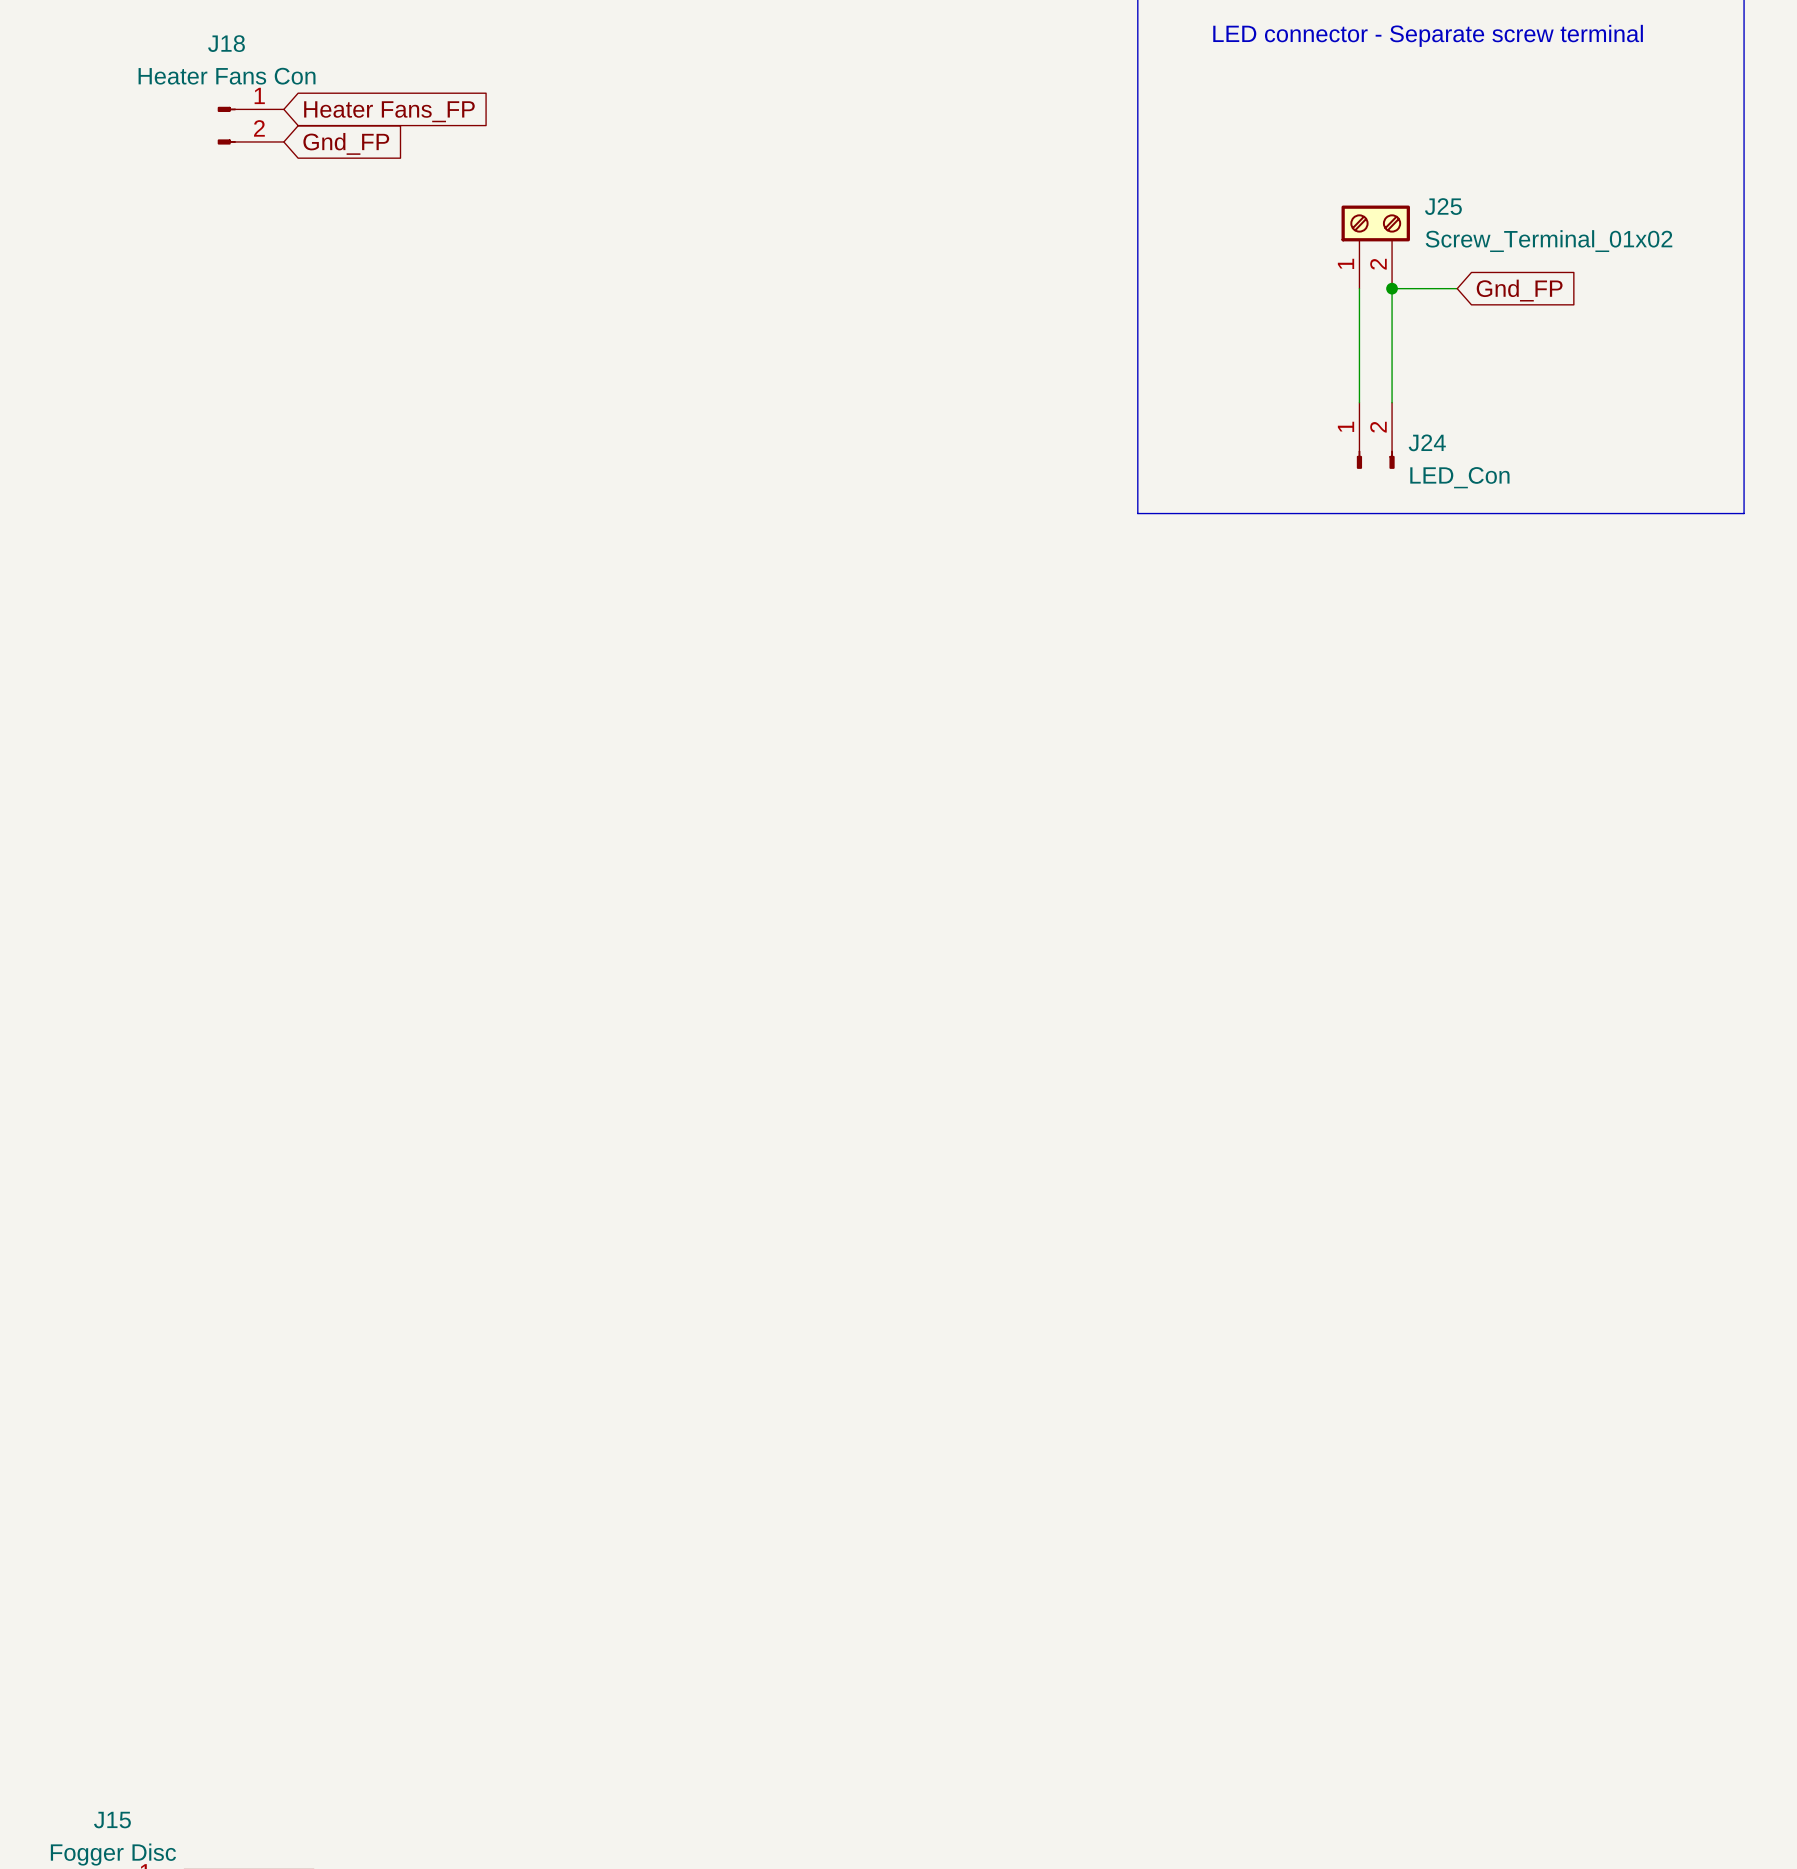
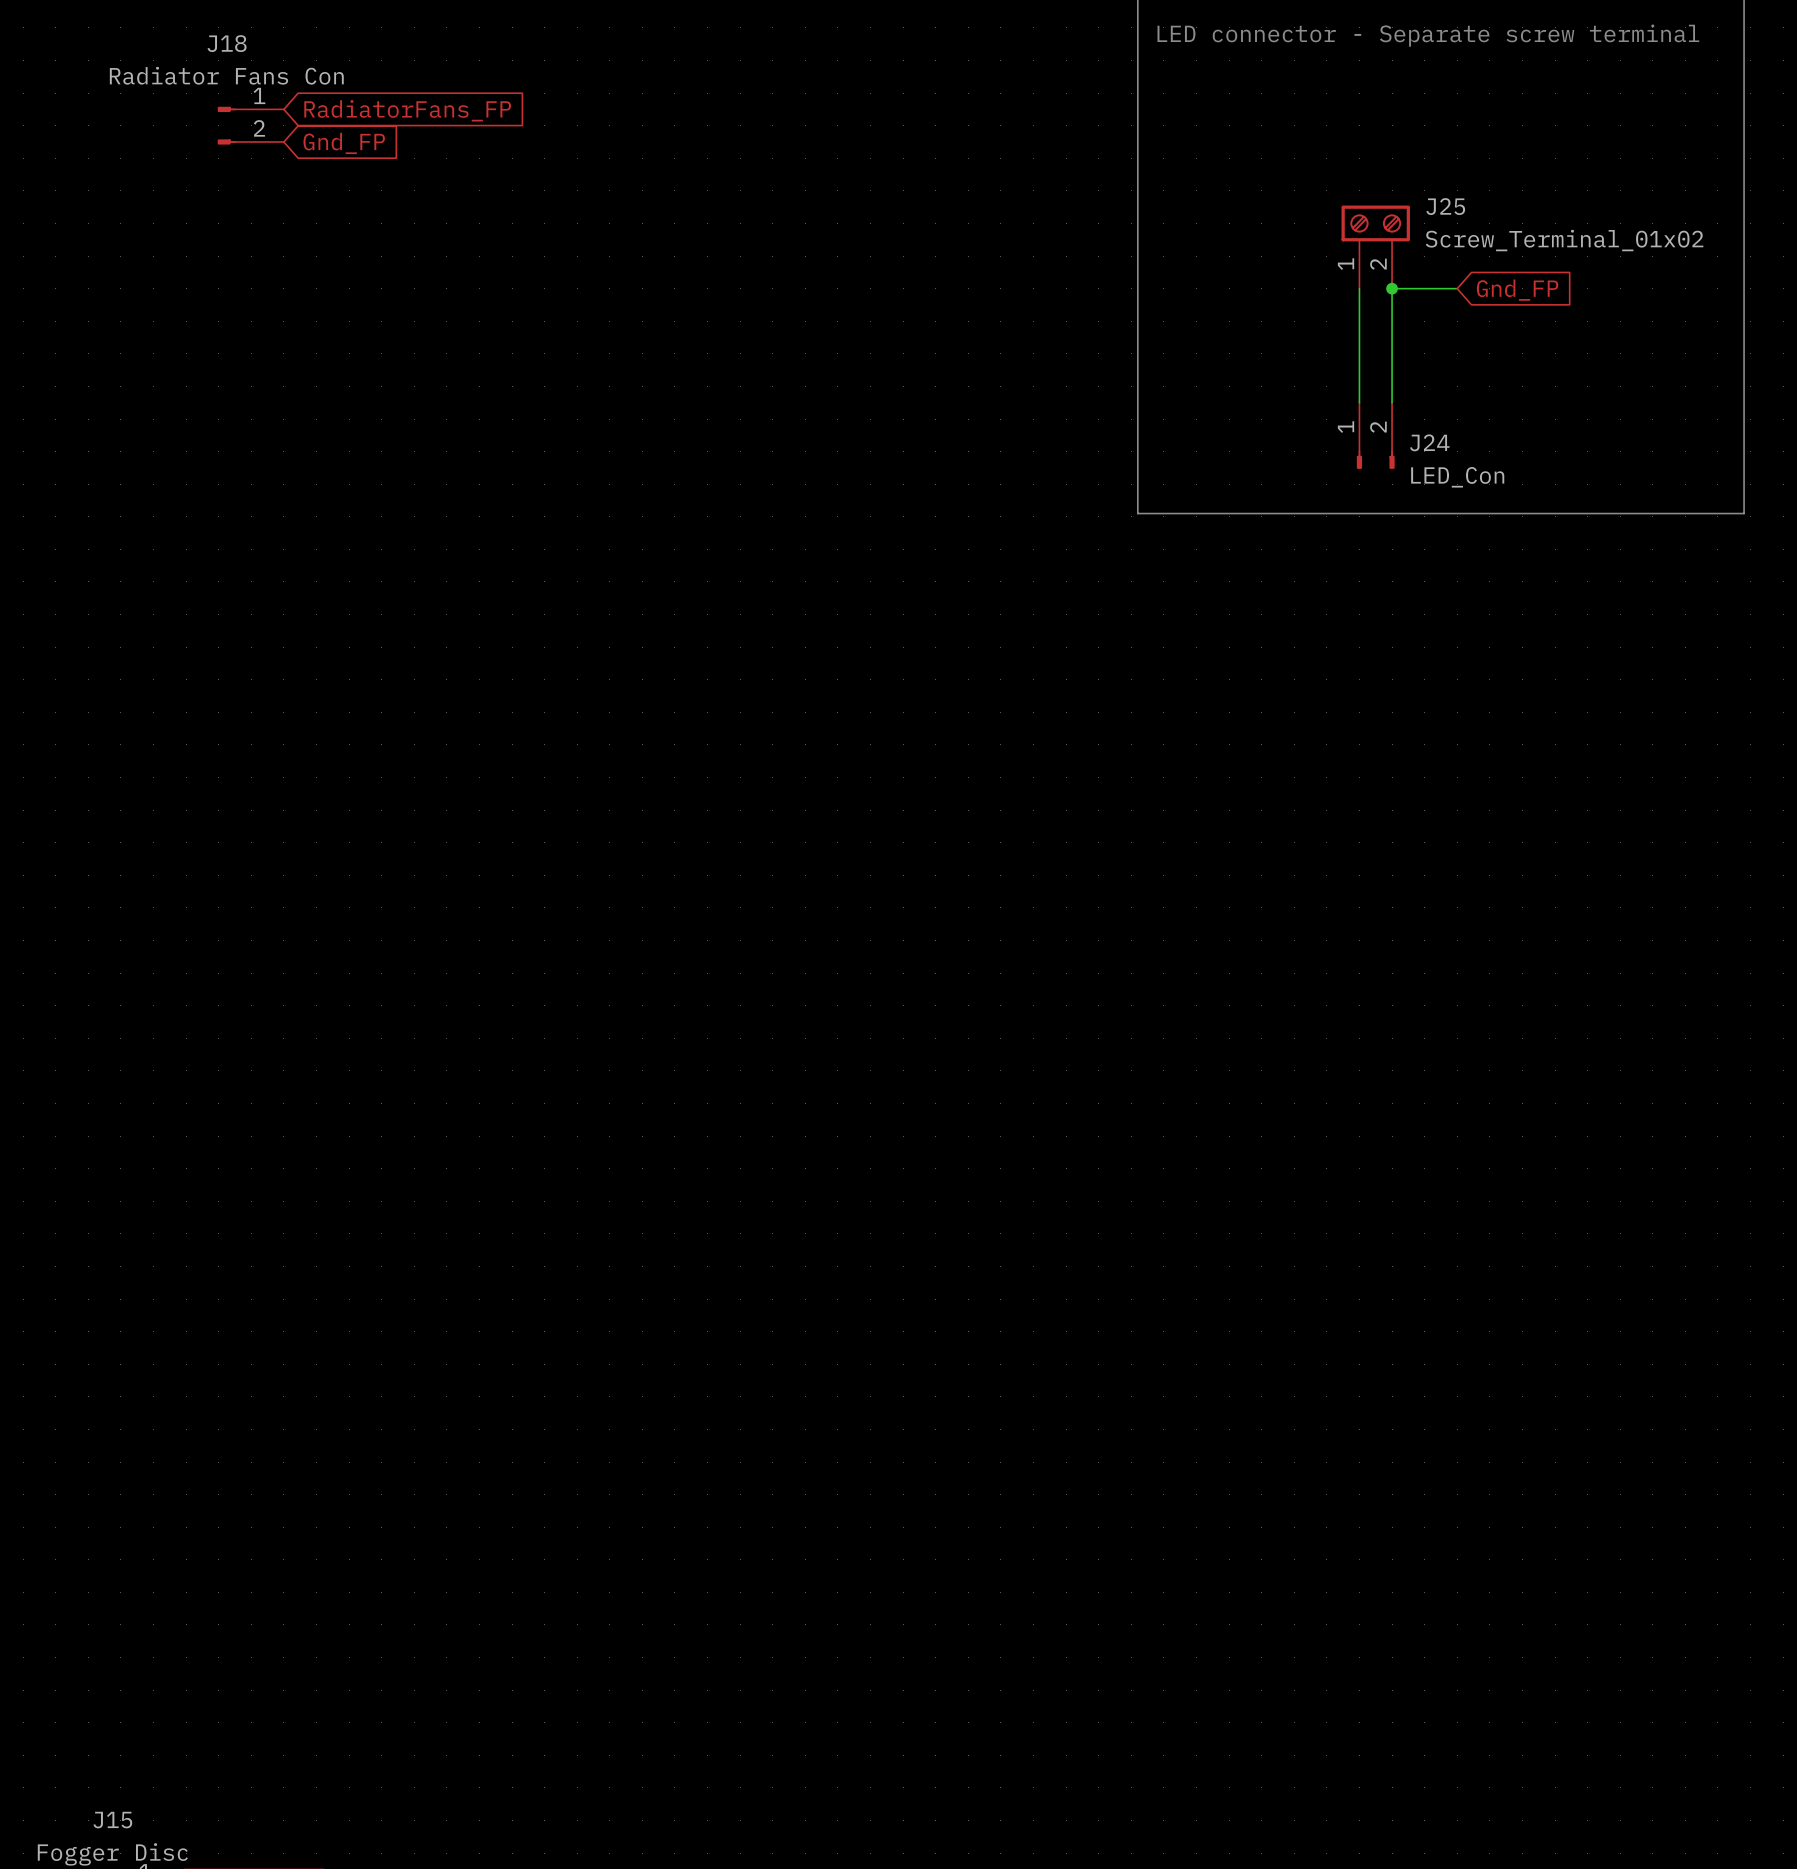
J18 value: Heater Fans Con (227, 76) -> Radiator Fans Con (226, 75)
global label: Heater Fans_FP (389, 111) -> RadiatorFans_FP (407, 110)

